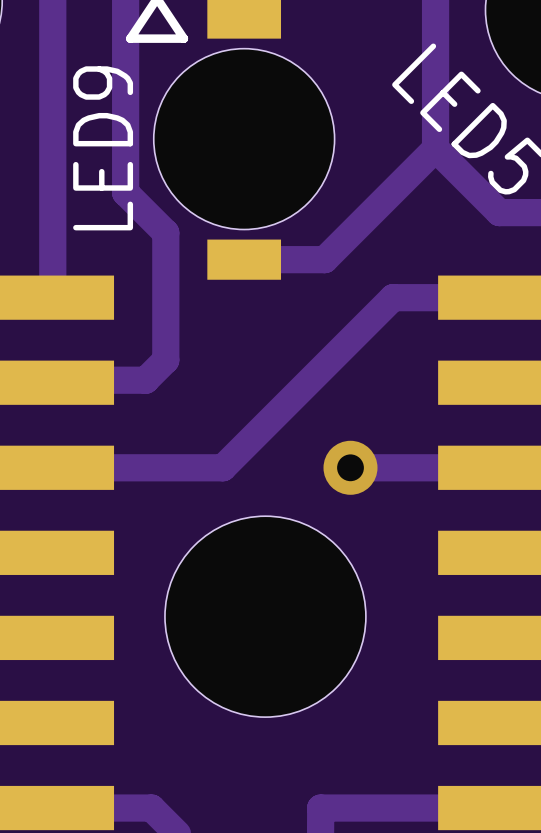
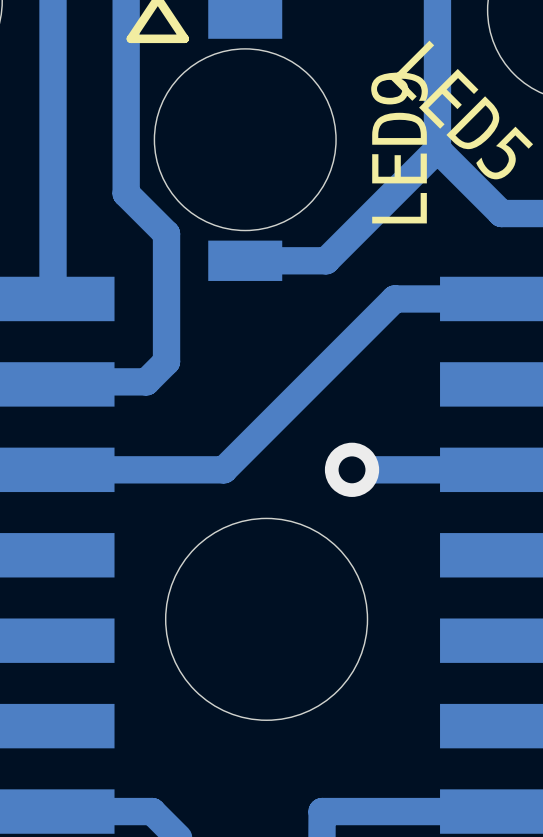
LED9 name position: LED9 (103, 148) -> LED9 (399, 147)

